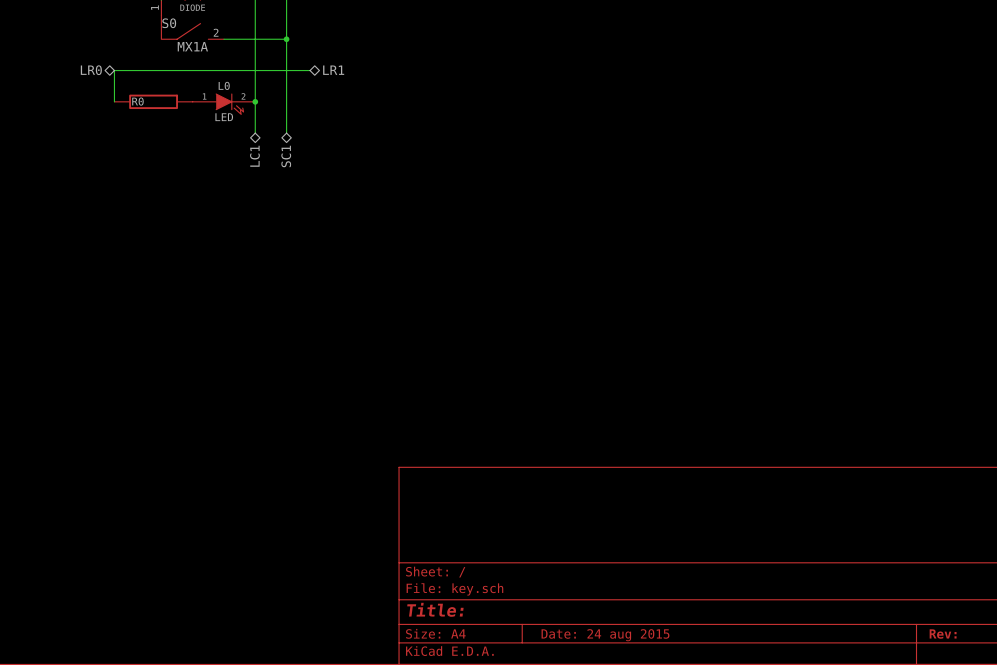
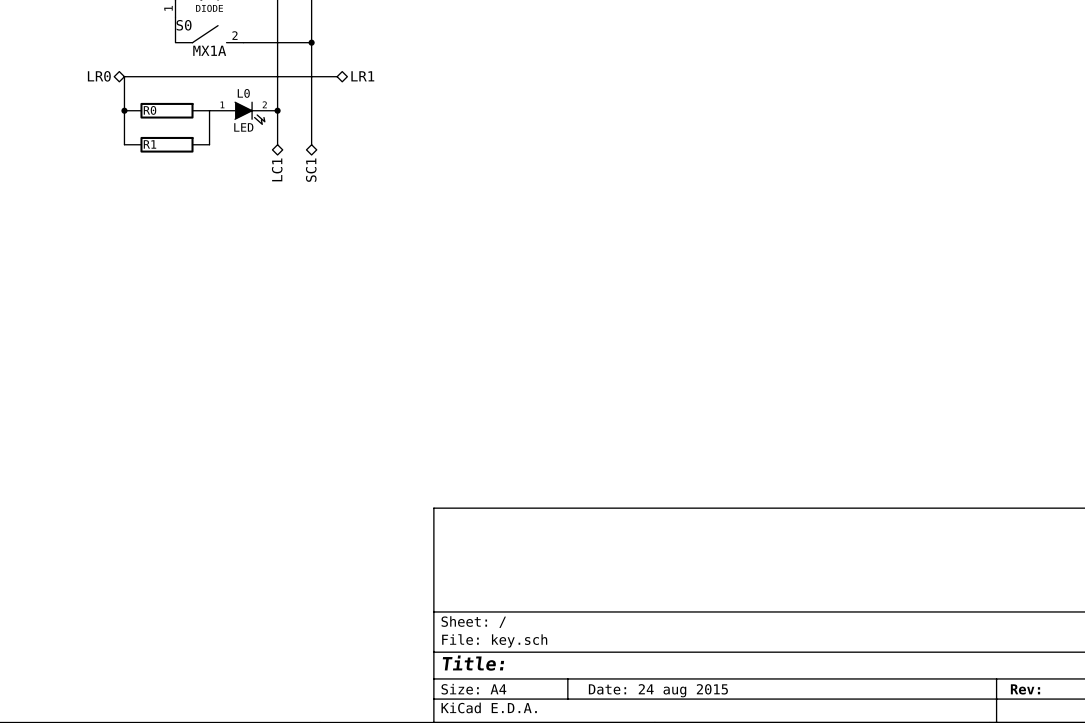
wire: none -> (124, 110) (124, 144)
junction: none -> (124, 110)
wire: none -> (209, 110) (209, 144)
R1: none -> (166, 144)

